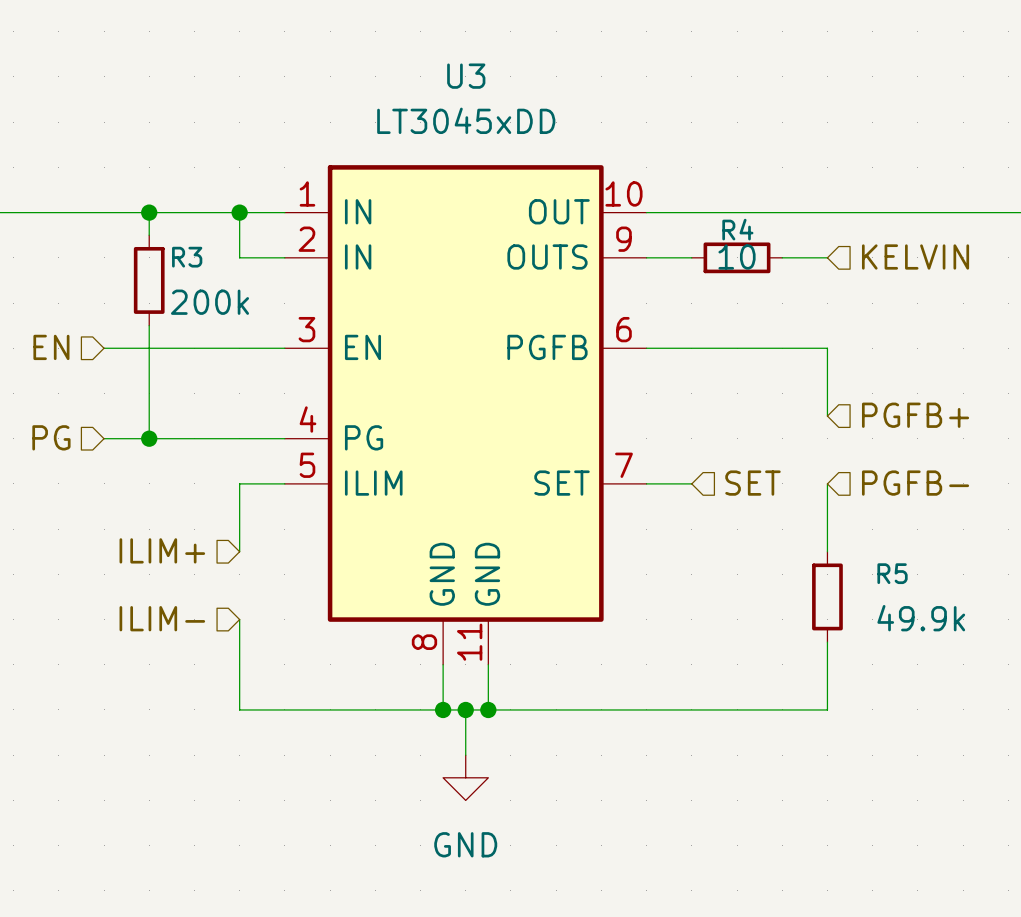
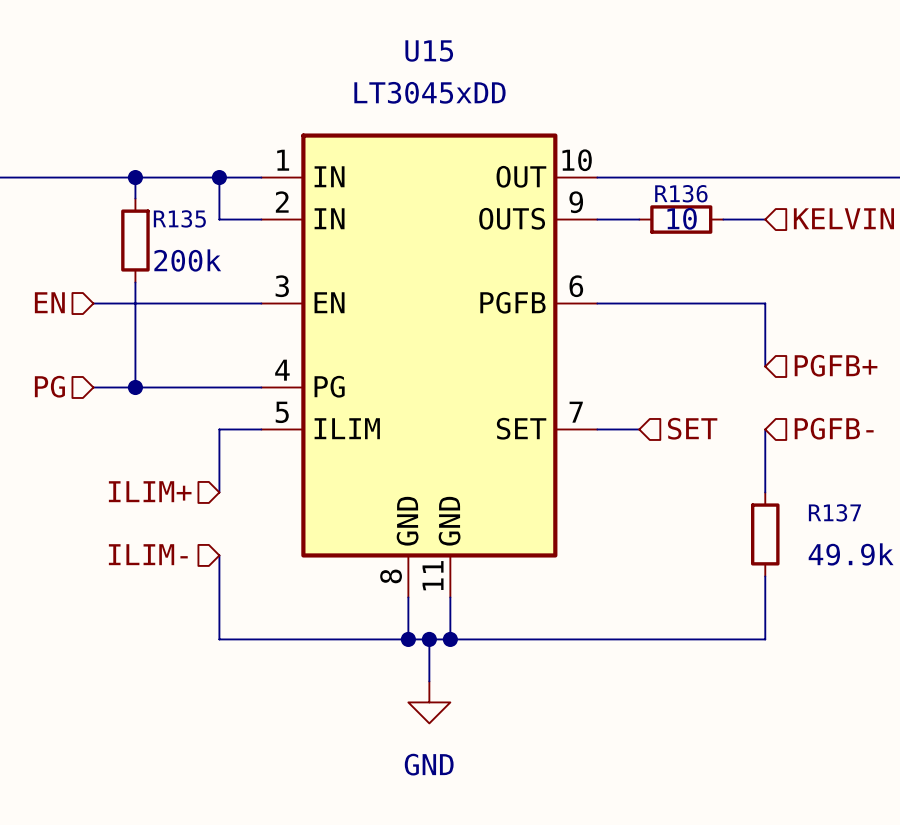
U3 name: U3 (466, 76) -> U15 (429, 50)
R4 name: R4 (737, 229) -> R136 (681, 193)
R3 name: R3 (187, 257) -> R135 (179, 218)
R5 name: R5 (892, 573) -> R137 (834, 512)

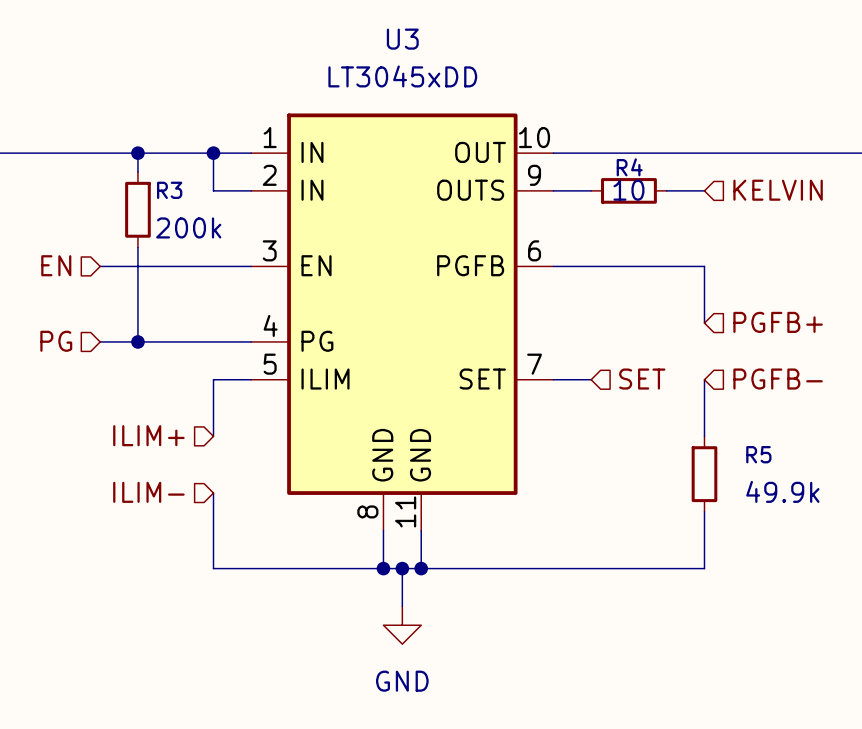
U15 name: U15 (429, 50) -> U3 (402, 39)
R136 name: R136 (681, 193) -> R4 (629, 167)
R135 name: R135 (179, 218) -> R3 (169, 190)
R137 name: R137 (834, 512) -> R5 (758, 454)

